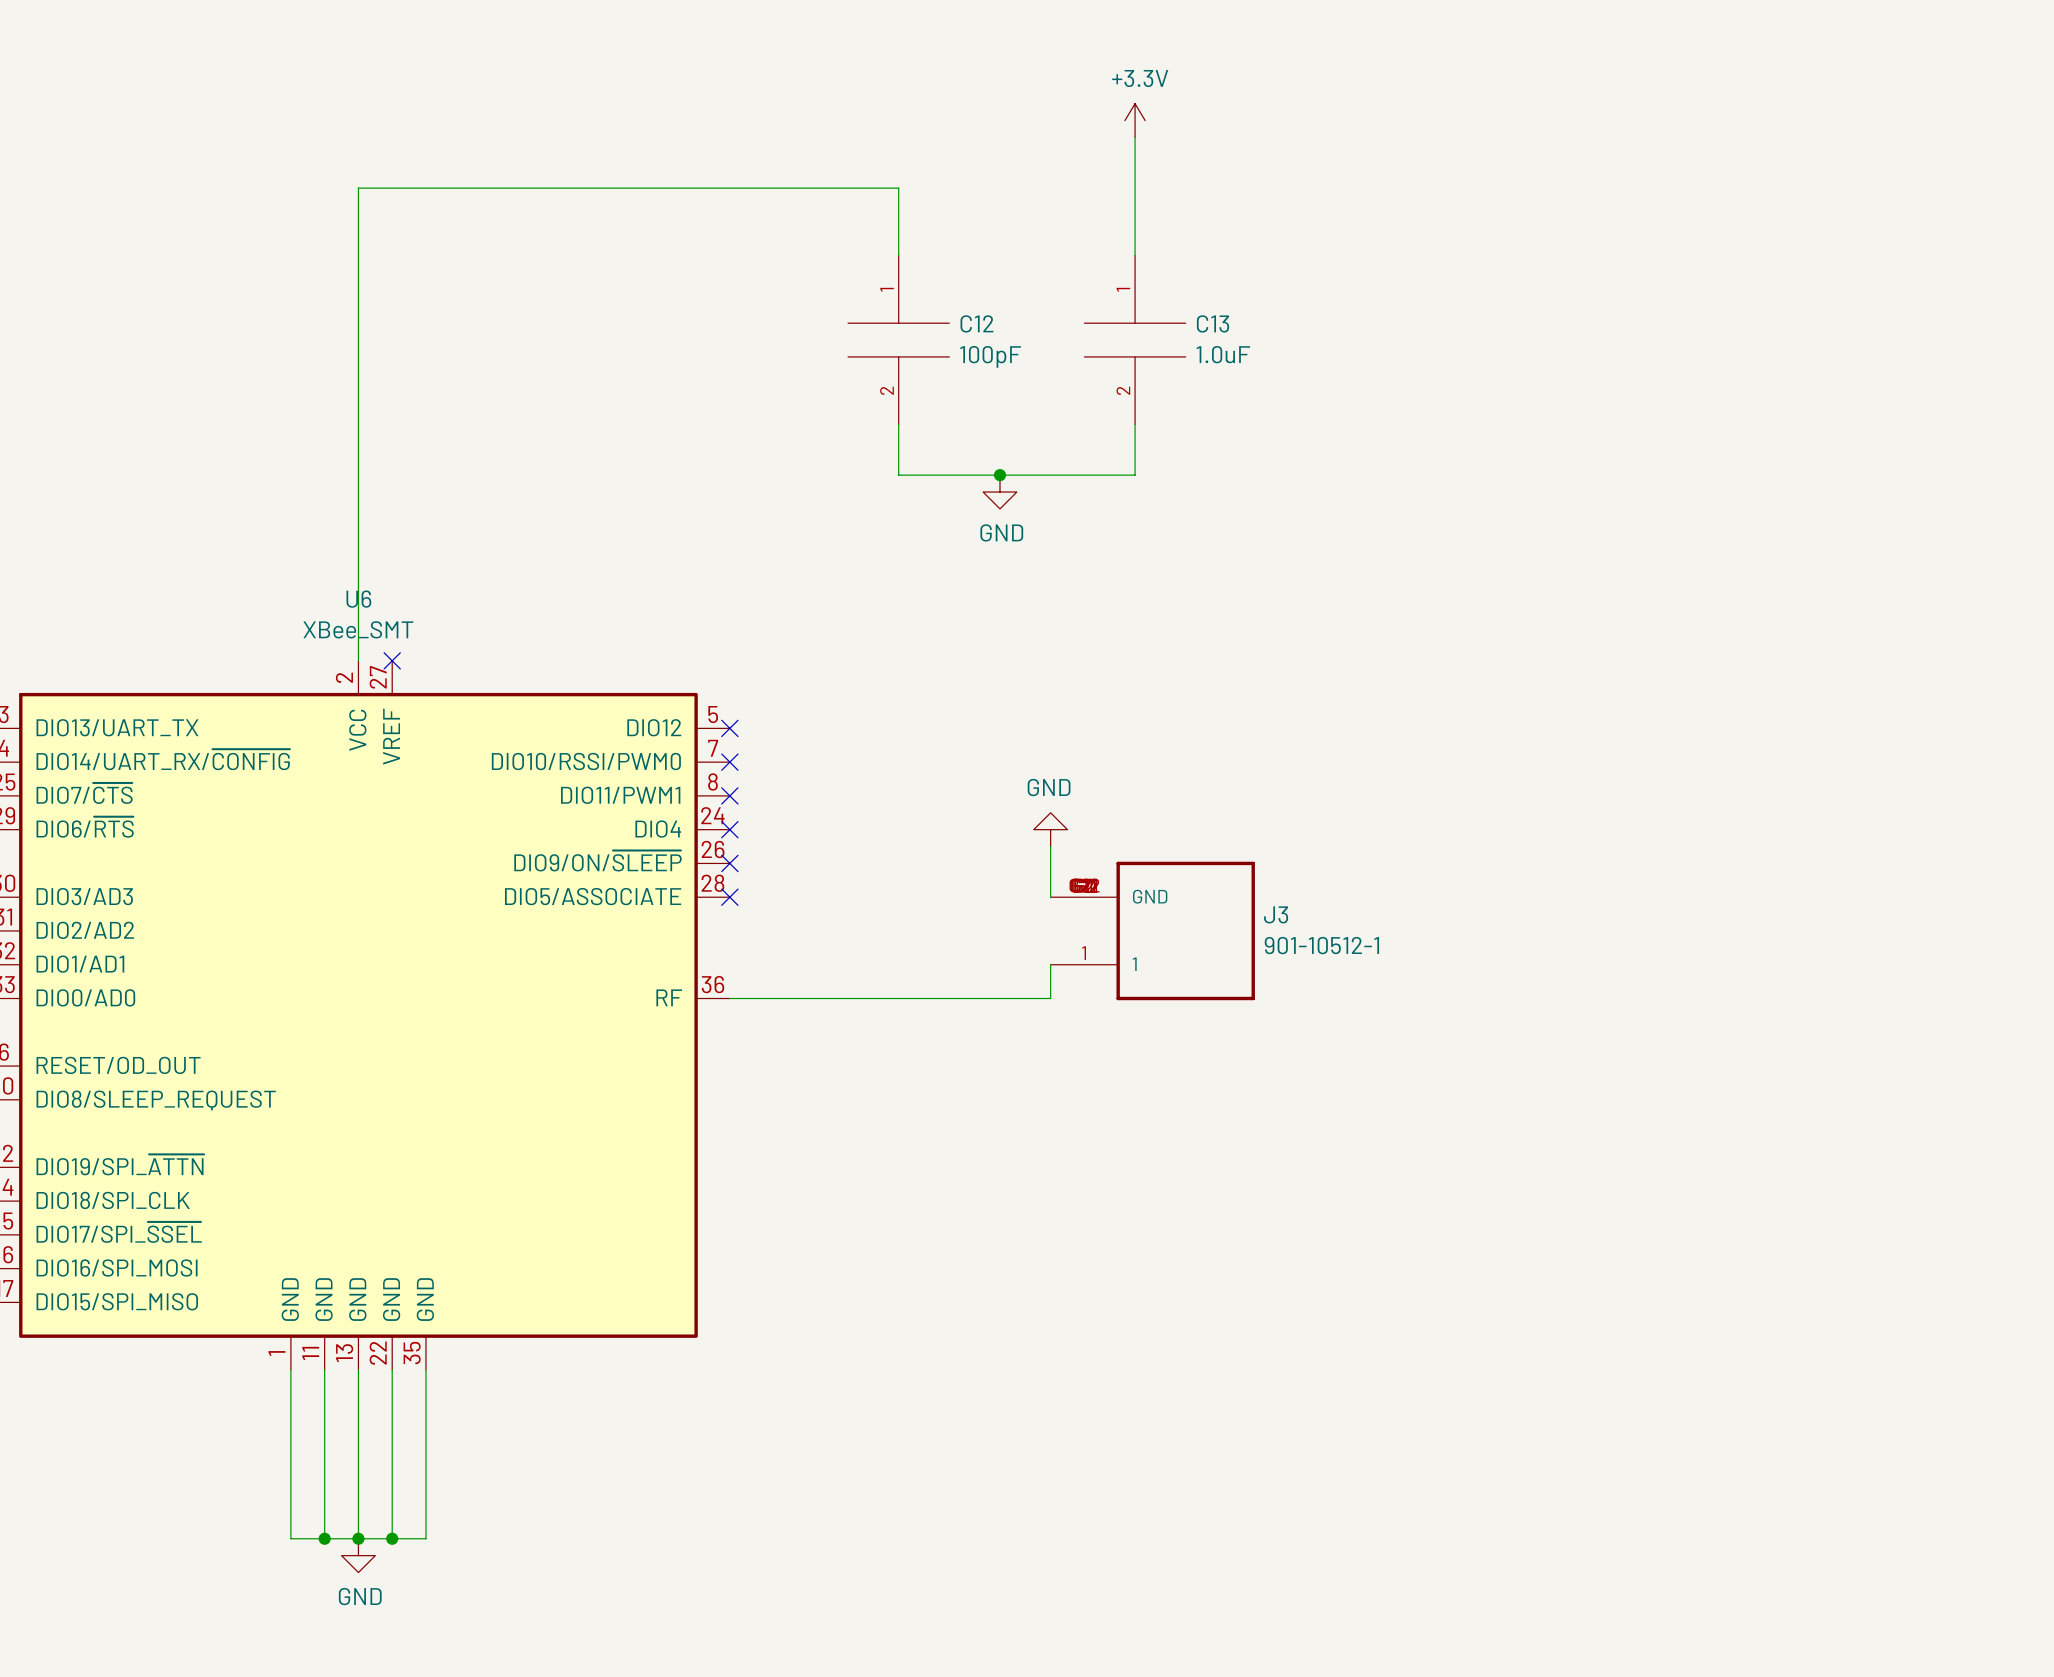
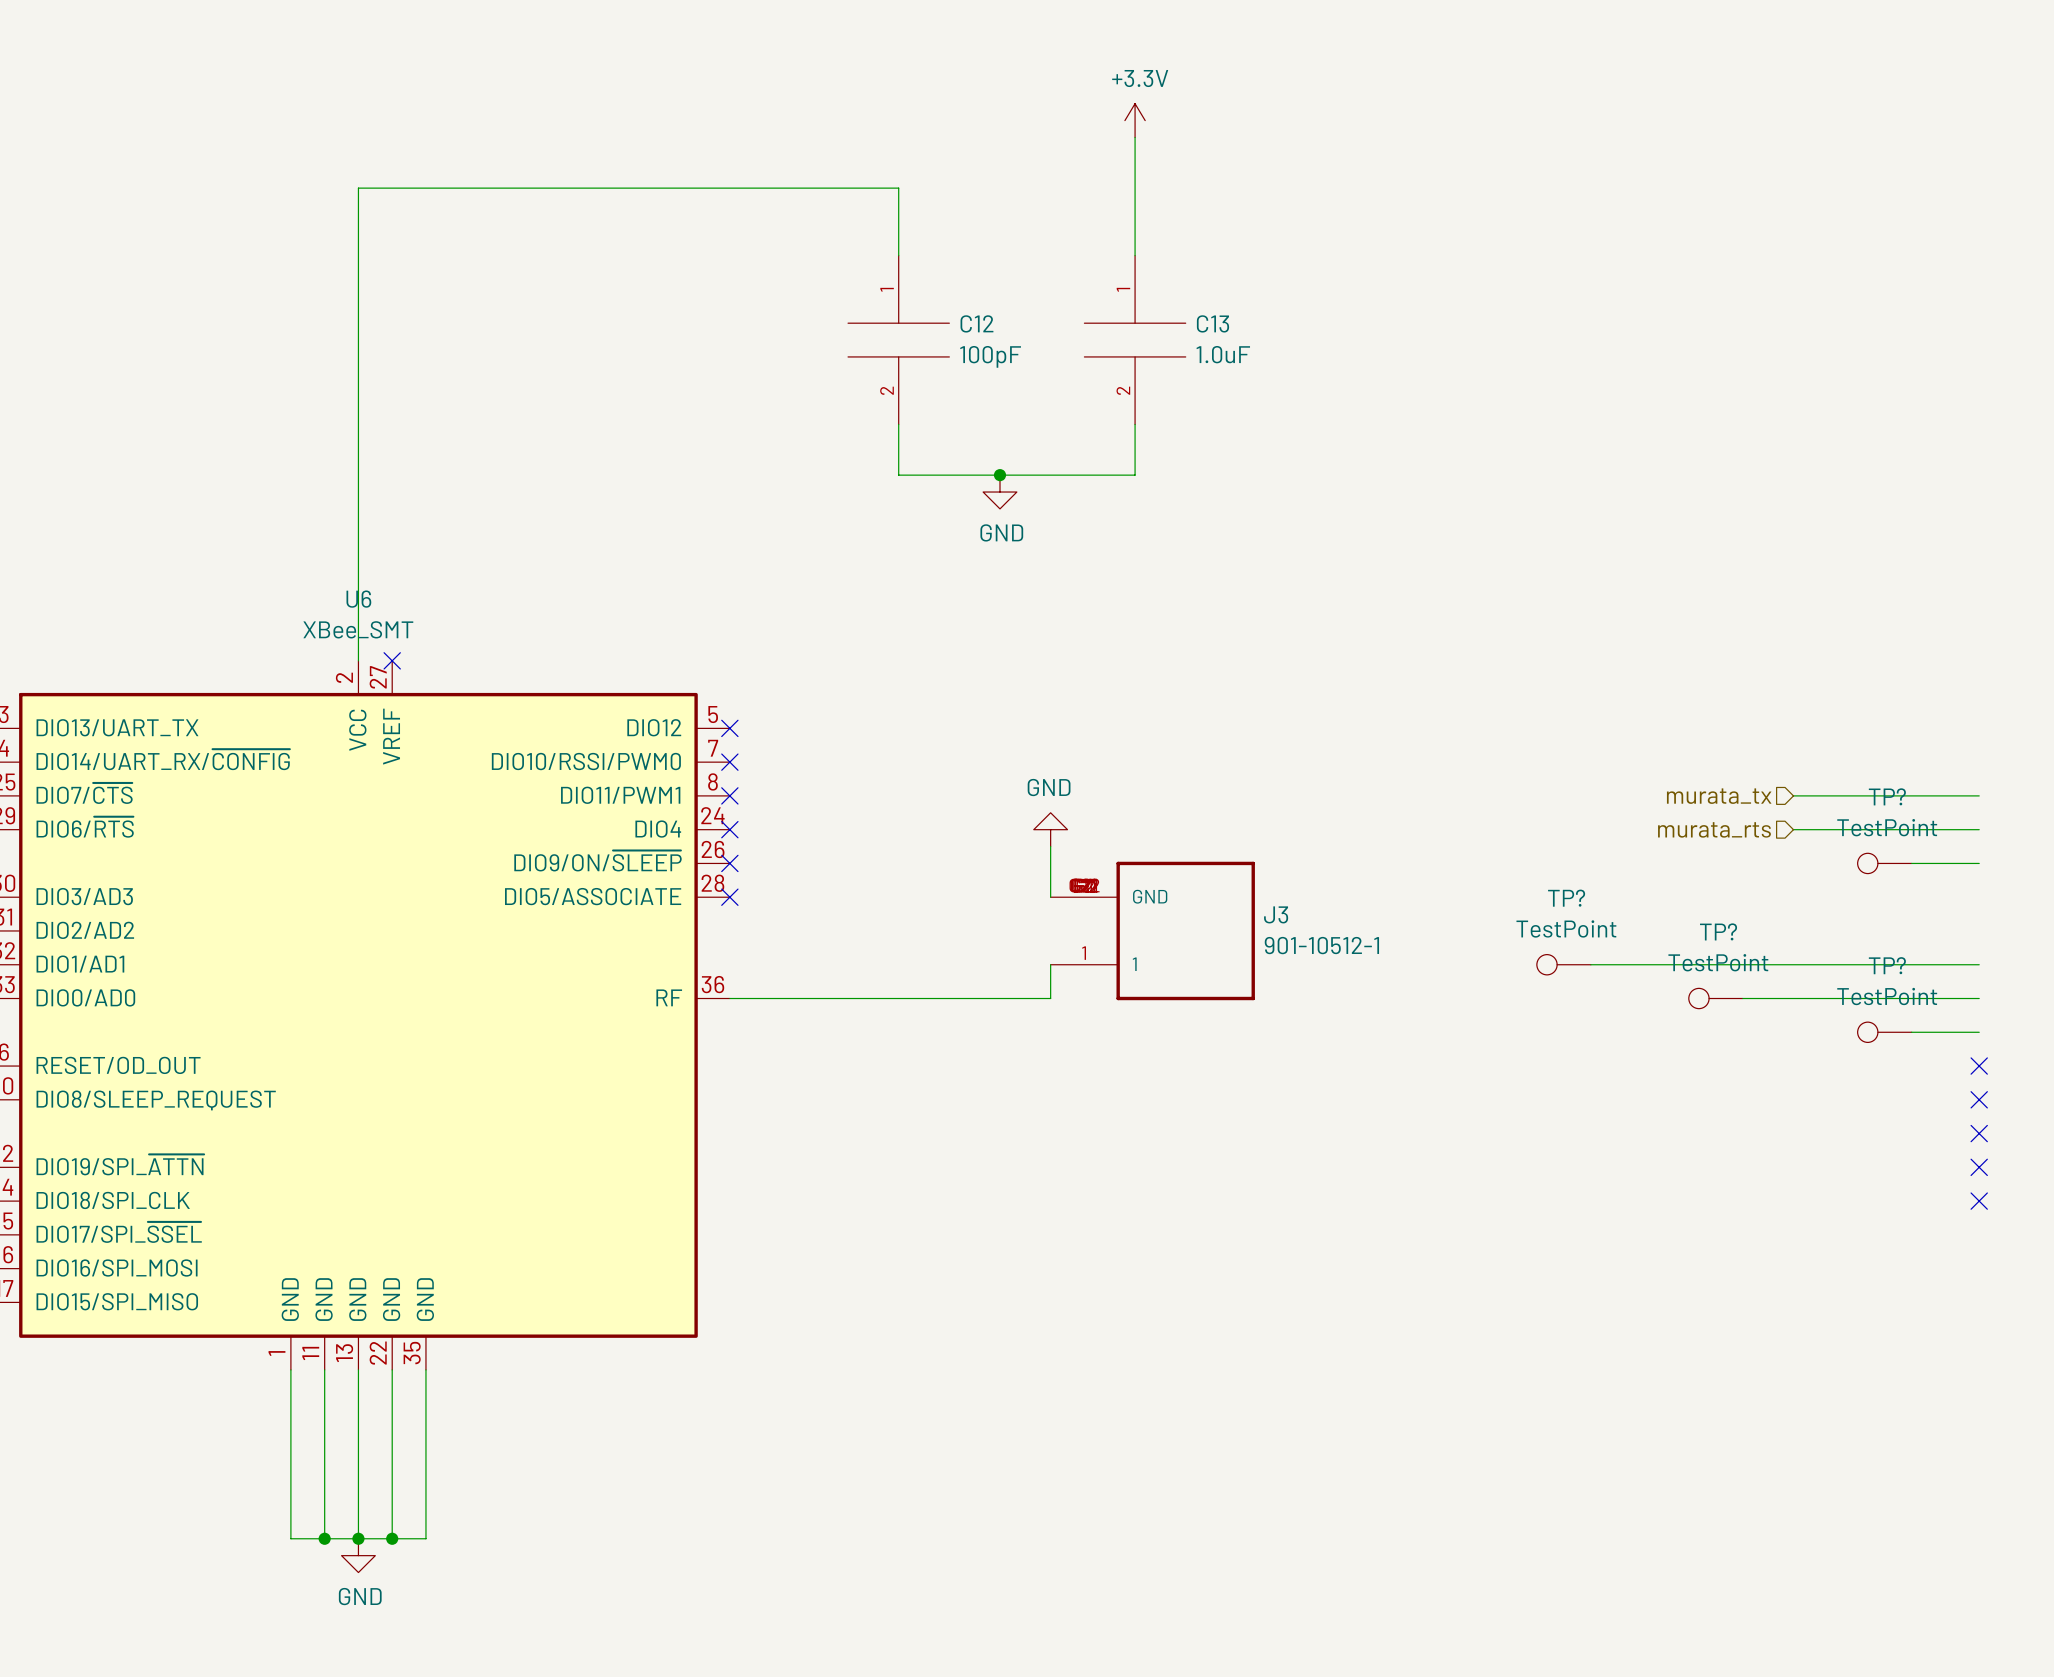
wire: none -> (1793, 795) (1979, 795)
hierarchical label: none -> murata_tx (1719, 796)
hierarchical label: none -> murata_rts (1714, 829)
wire: none -> (1793, 829) (1979, 829)
TP?: none -> TestPoint (1884, 863)
wire: none -> (1911, 863) (1979, 863)
TP?: none -> TestPoint (1563, 964)
wire: none -> (1590, 964) (1979, 964)
TP?: none -> TestPoint (1715, 998)
wire: none -> (1742, 998) (1979, 998)
TP?: none -> TestPoint (1884, 1032)
wire: none -> (1911, 1032) (1979, 1032)
no-connect mark: none -> (1979, 1066)
no-connect mark: none -> (1979, 1099)
no-connect mark: none -> (1979, 1133)
no-connect mark: none -> (1979, 1167)
no-connect mark: none -> (1979, 1201)

